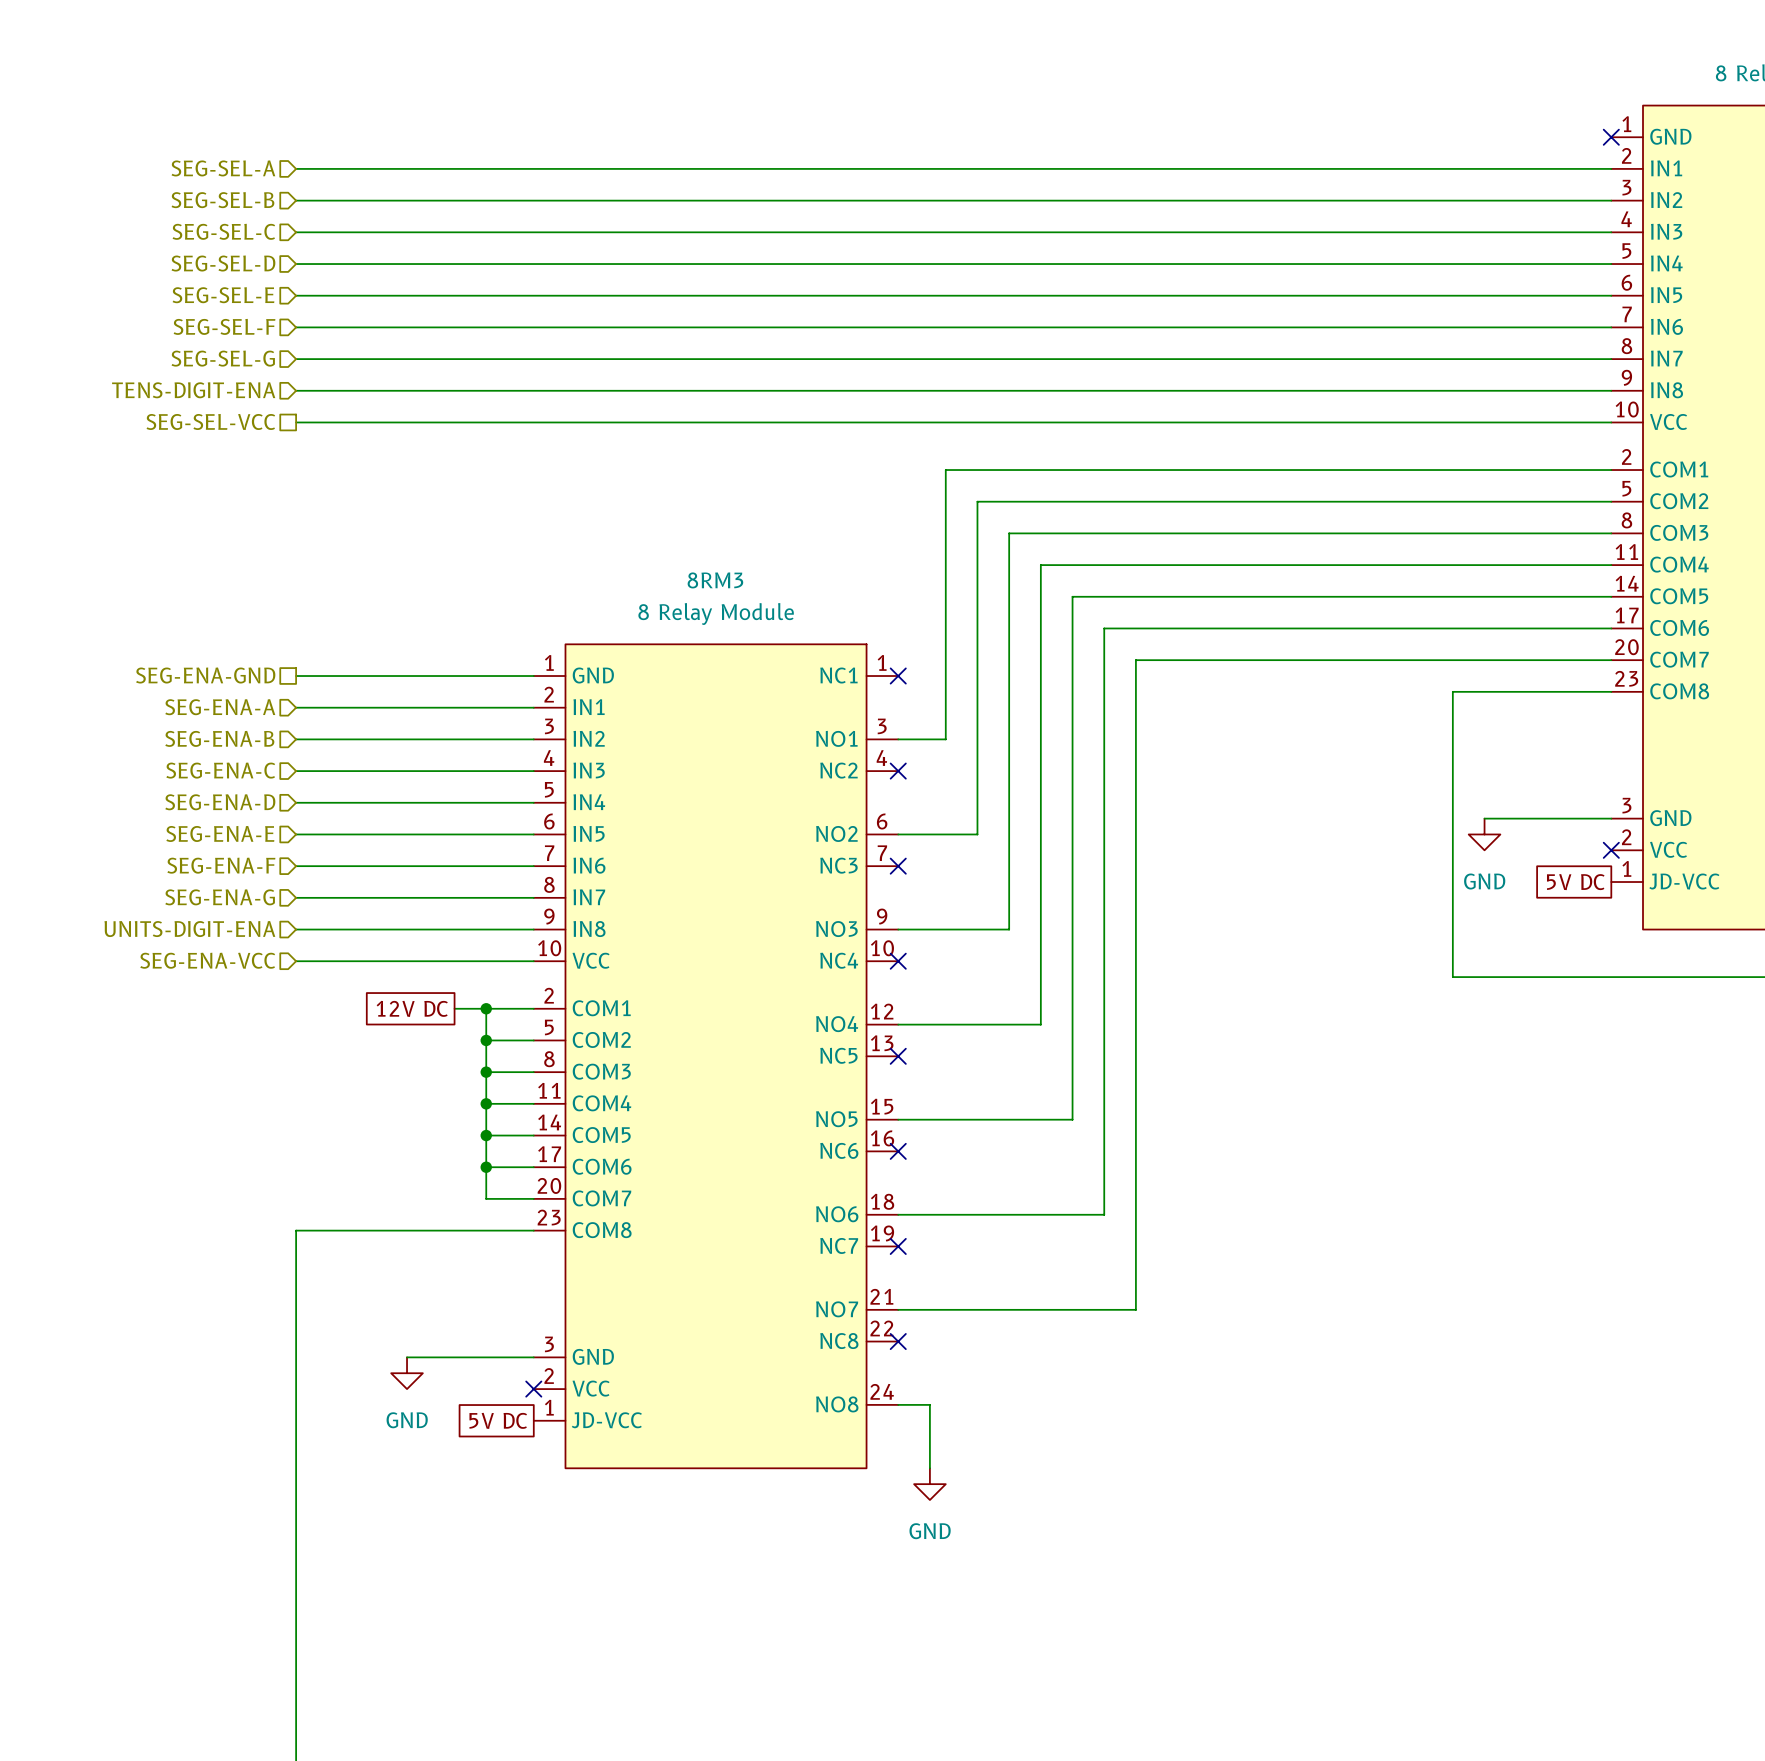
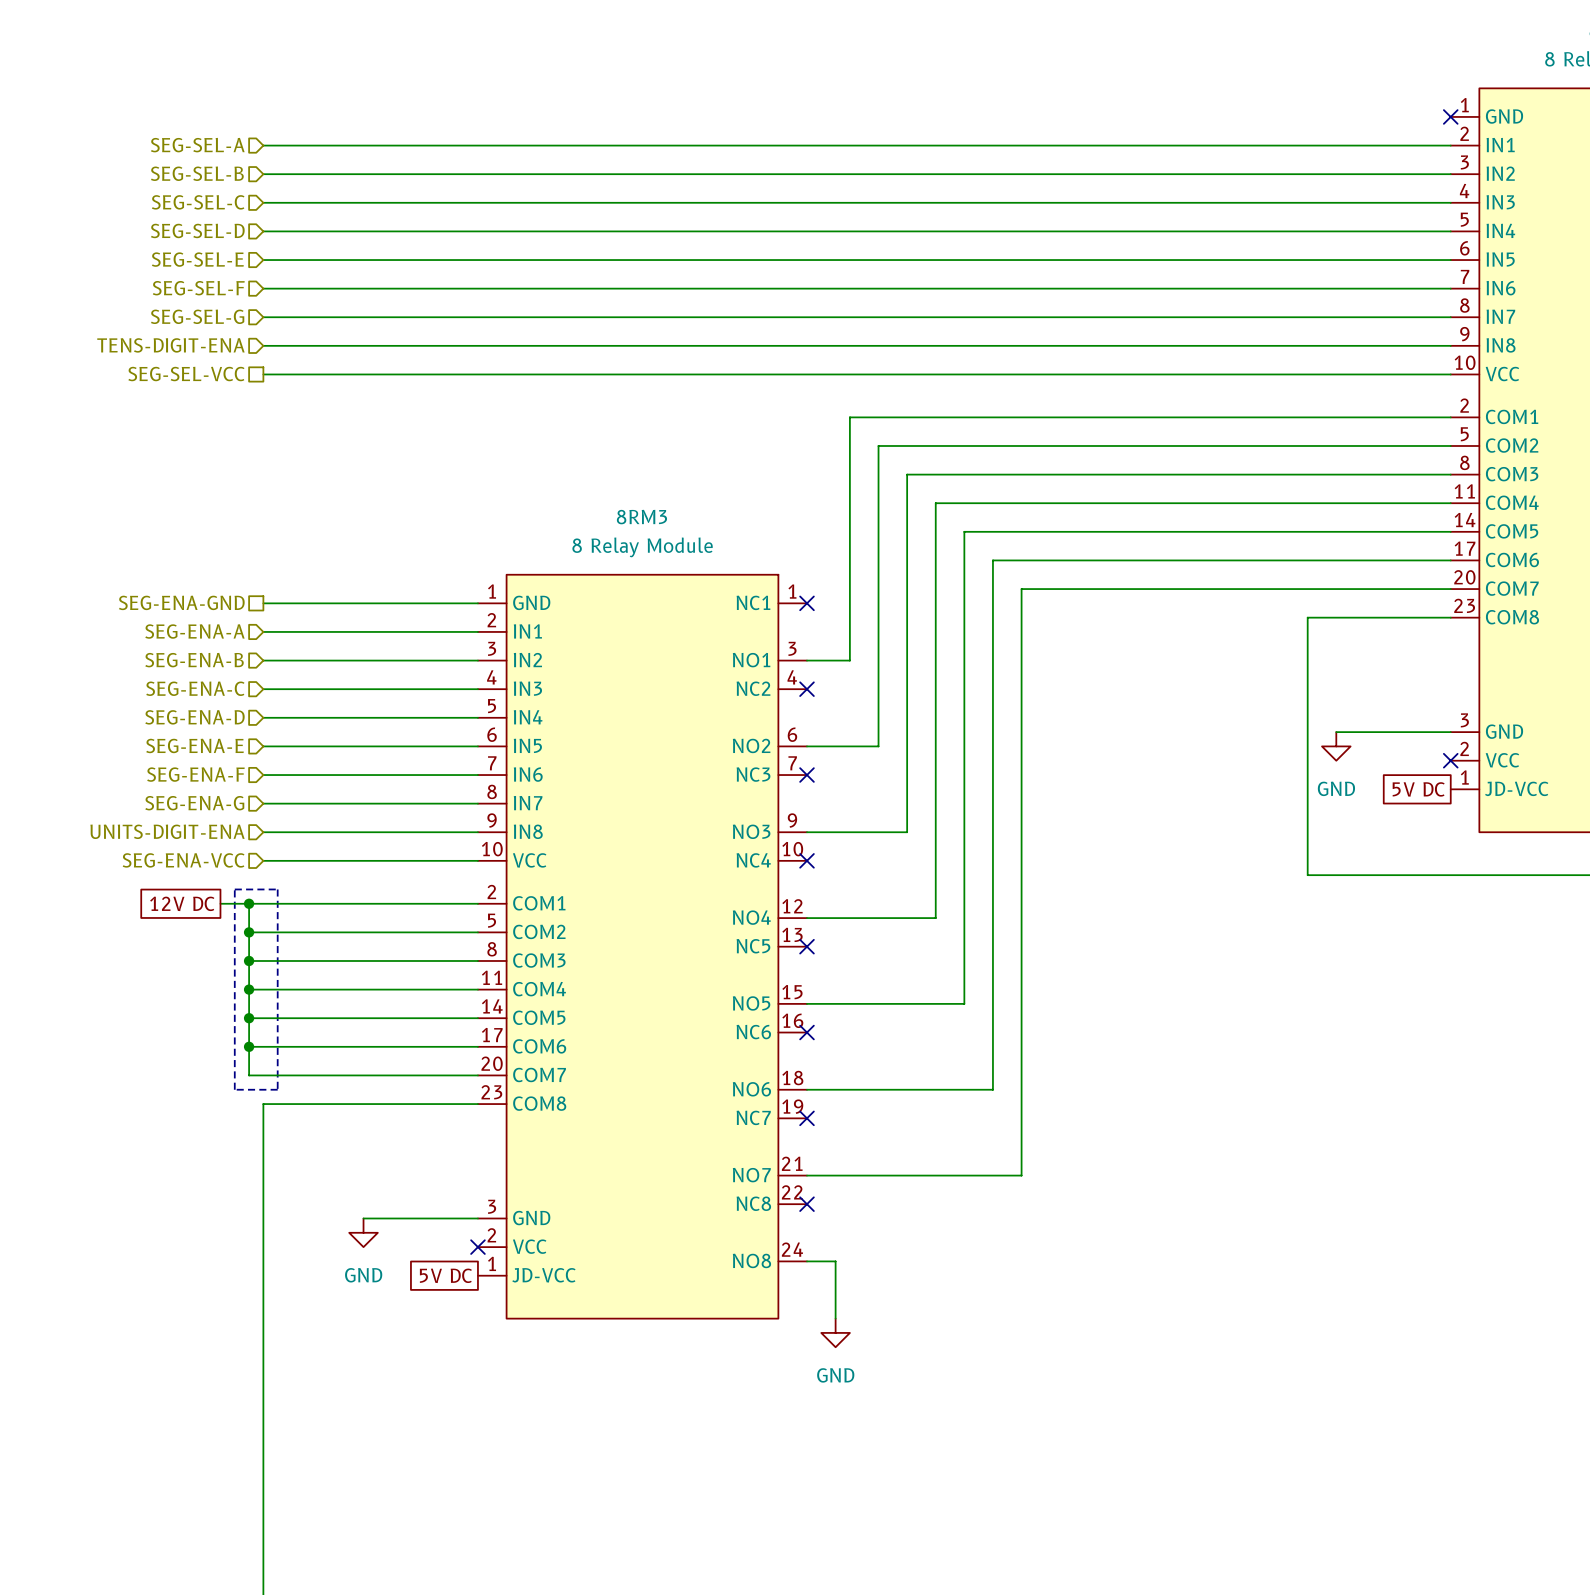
line: none -> (234, 889) (277, 889) (277, 1089) (234, 1089) (234, 889)
wire: none -> (220, 903) (406, 903)
junction: none -> (249, 903)
global label position: 12V DC (412, 1008) -> 12V DC (182, 903)
wire: (486, 1008) (486, 1198) -> (249, 903) (249, 1075) (435, 1075)
junction: (486, 1008) -> none
wire: none -> (249, 932) (435, 932)
junction: none -> (249, 932)
junction: (486, 1040) -> none
wire: none -> (249, 960) (435, 960)
junction: none -> (249, 960)
junction: (486, 1072) -> none
wire: none -> (249, 989) (435, 989)
junction: none -> (249, 989)
junction: (486, 1103) -> none
wire: none -> (249, 1018) (435, 1018)
junction: none -> (249, 1018)
junction: (486, 1135) -> none
wire: none -> (249, 1046) (435, 1046)
junction: none -> (249, 1046)
junction: (486, 1167) -> none

